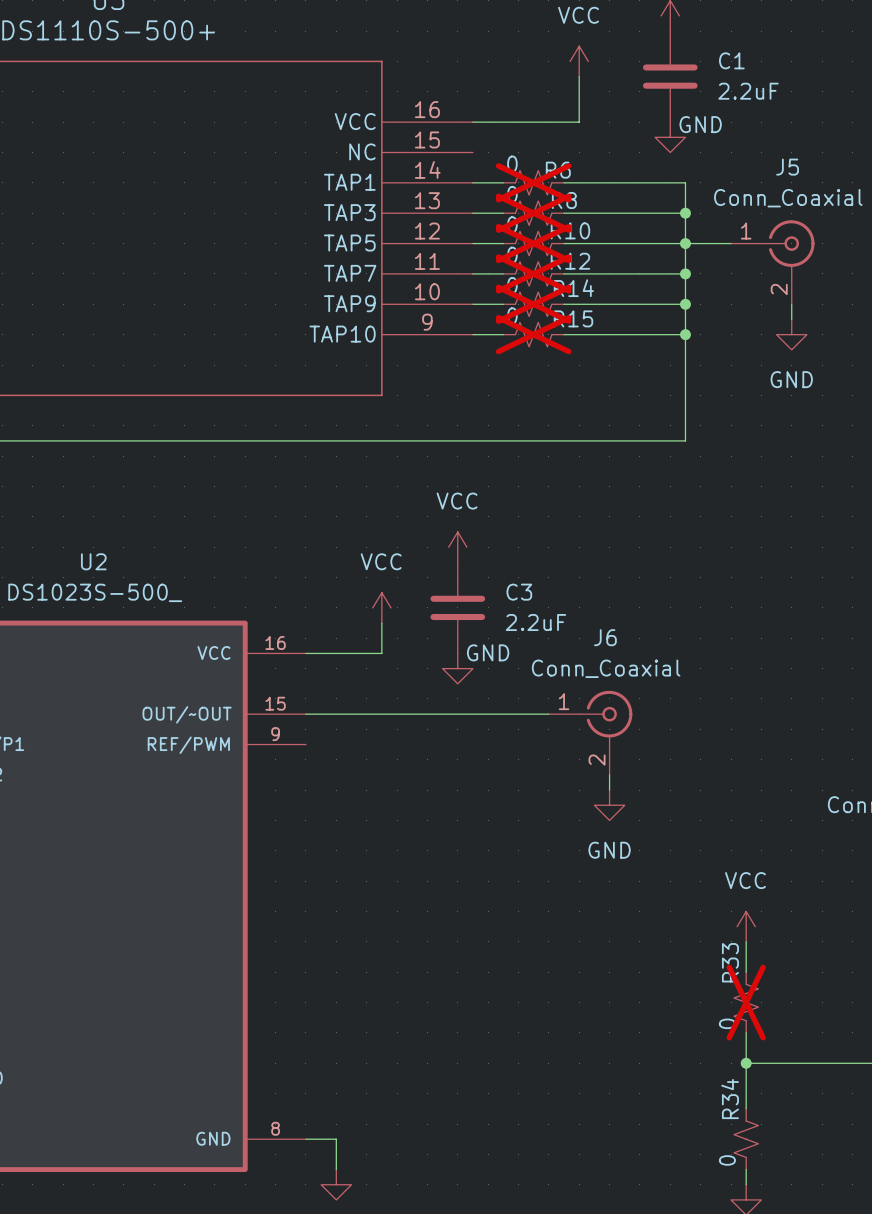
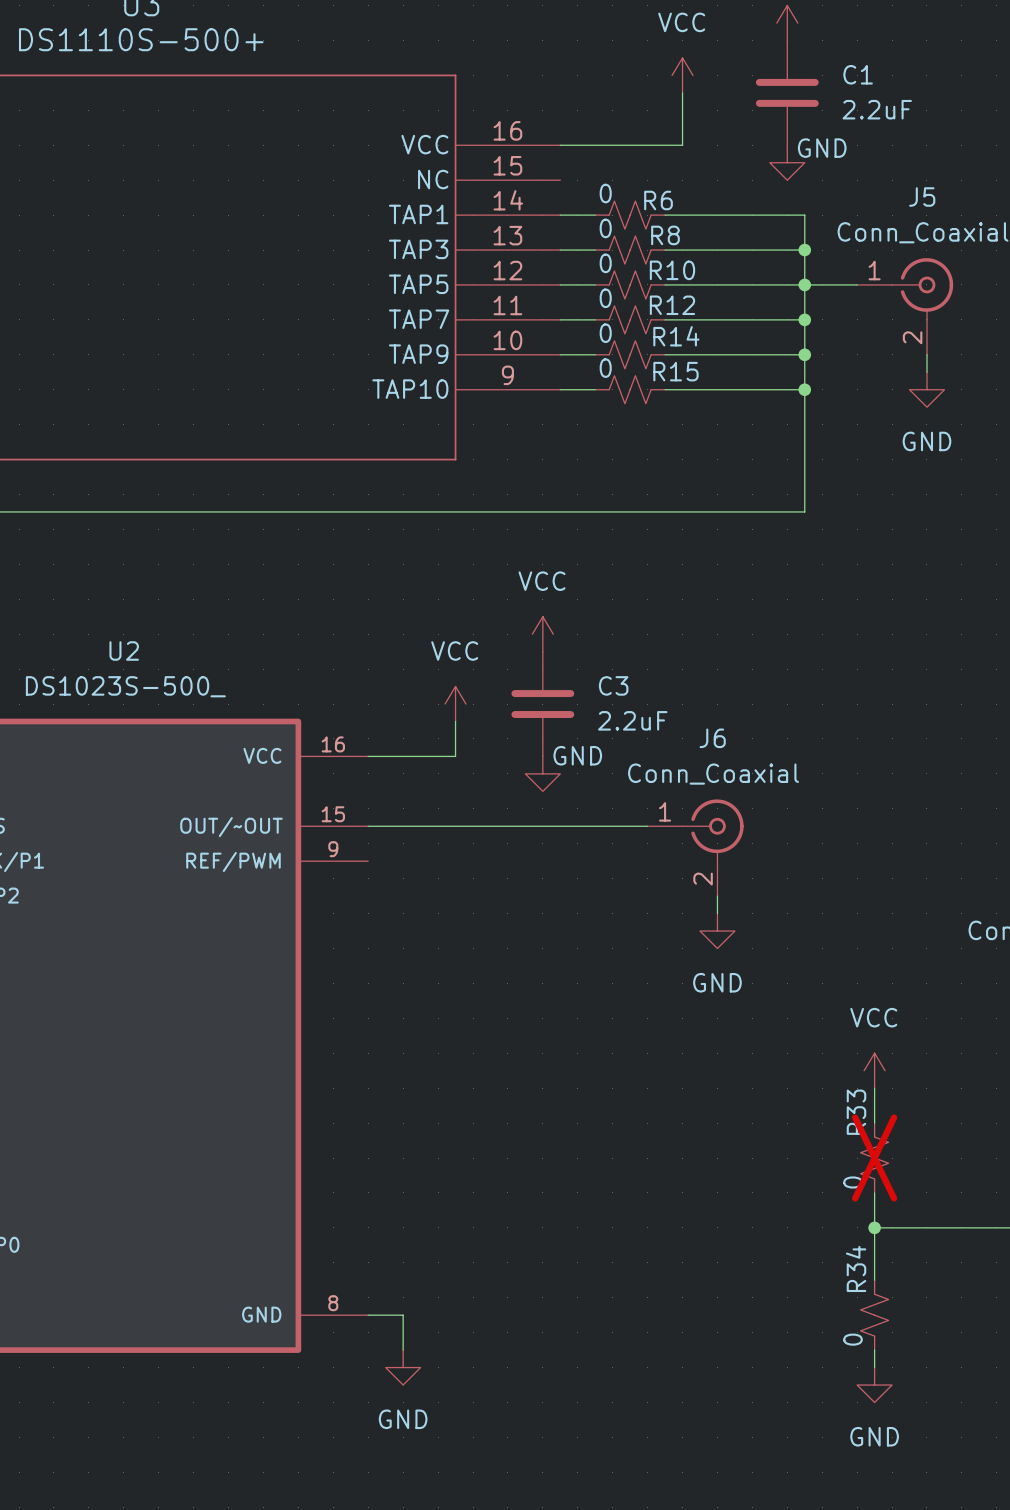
R6 do-not-place cross: (533, 182) -> none
R8 do-not-place cross: (533, 213) -> none
R10 do-not-place cross: (533, 243) -> none
R12 do-not-place cross: (533, 273) -> none
R14 do-not-place cross: (533, 304) -> none
R15 do-not-place cross: (533, 334) -> none

